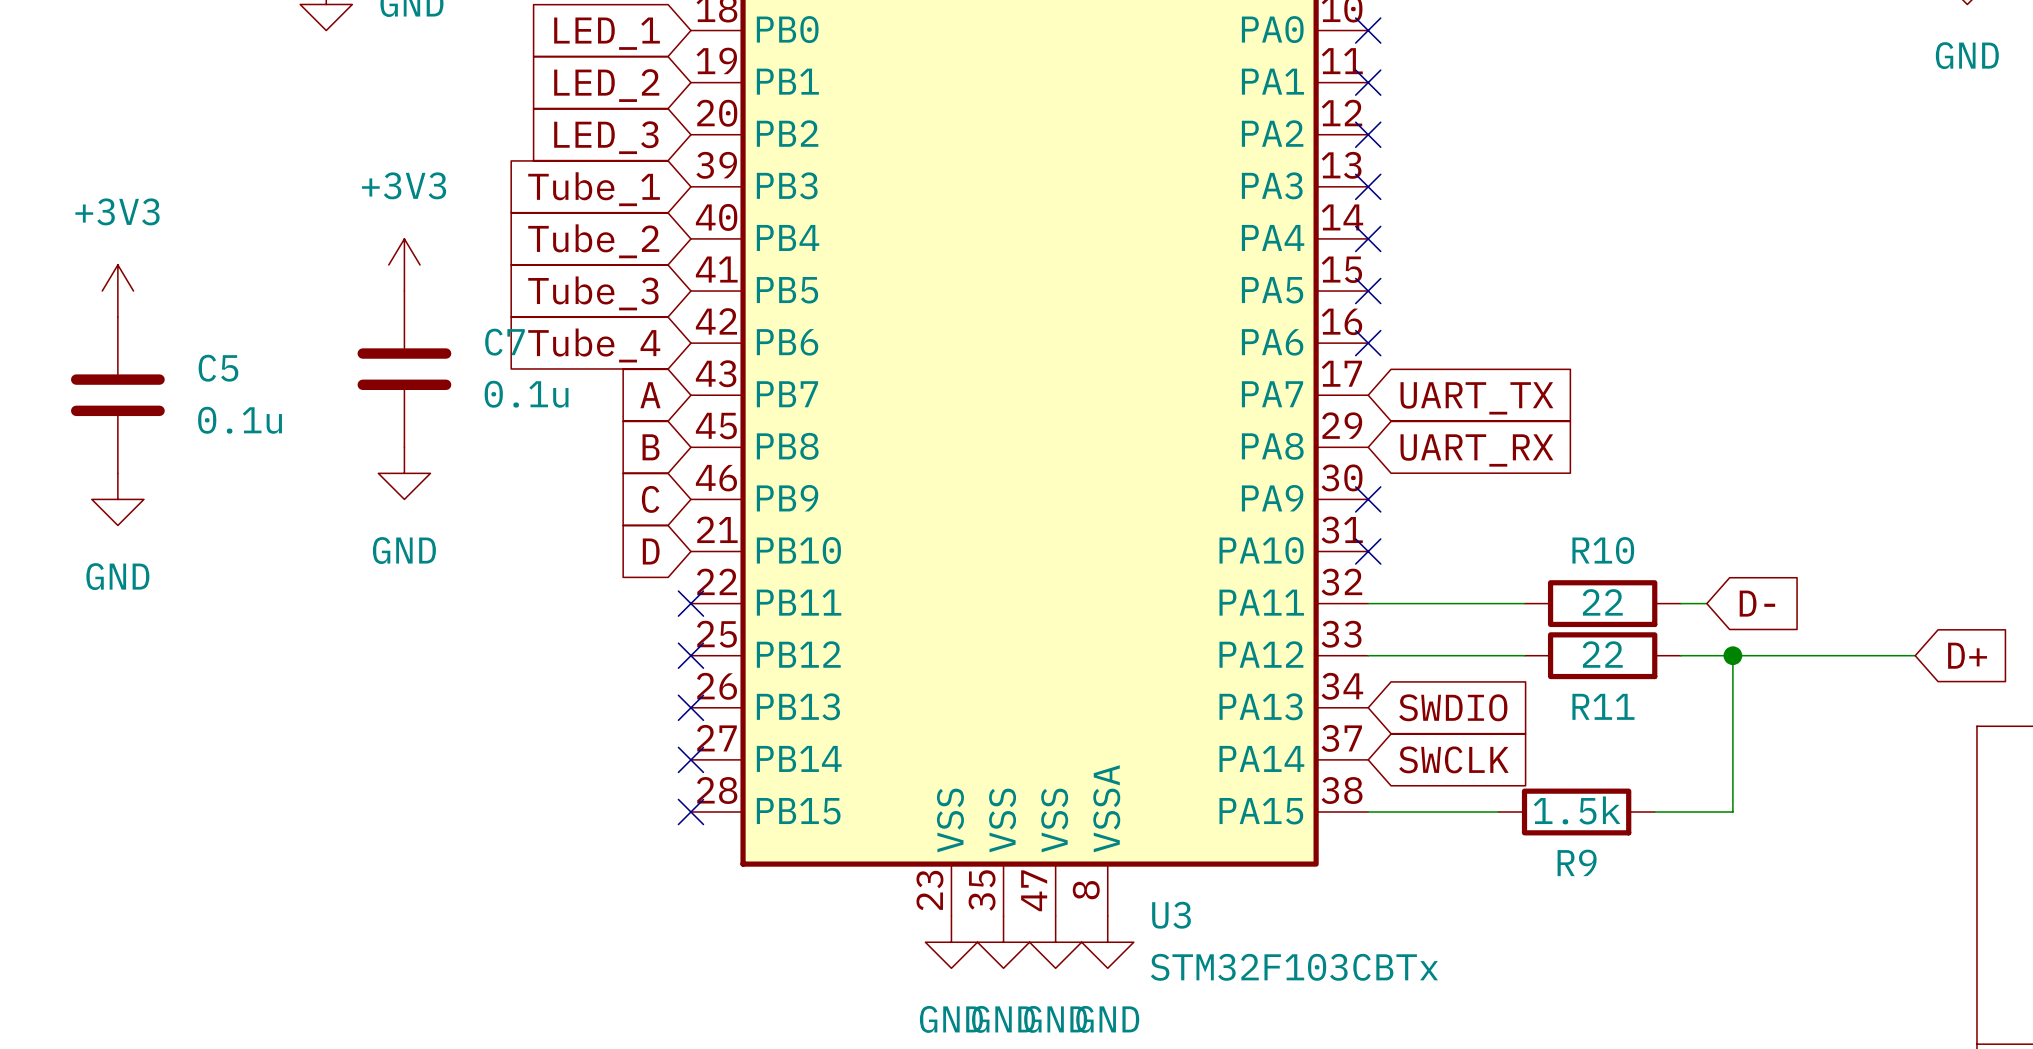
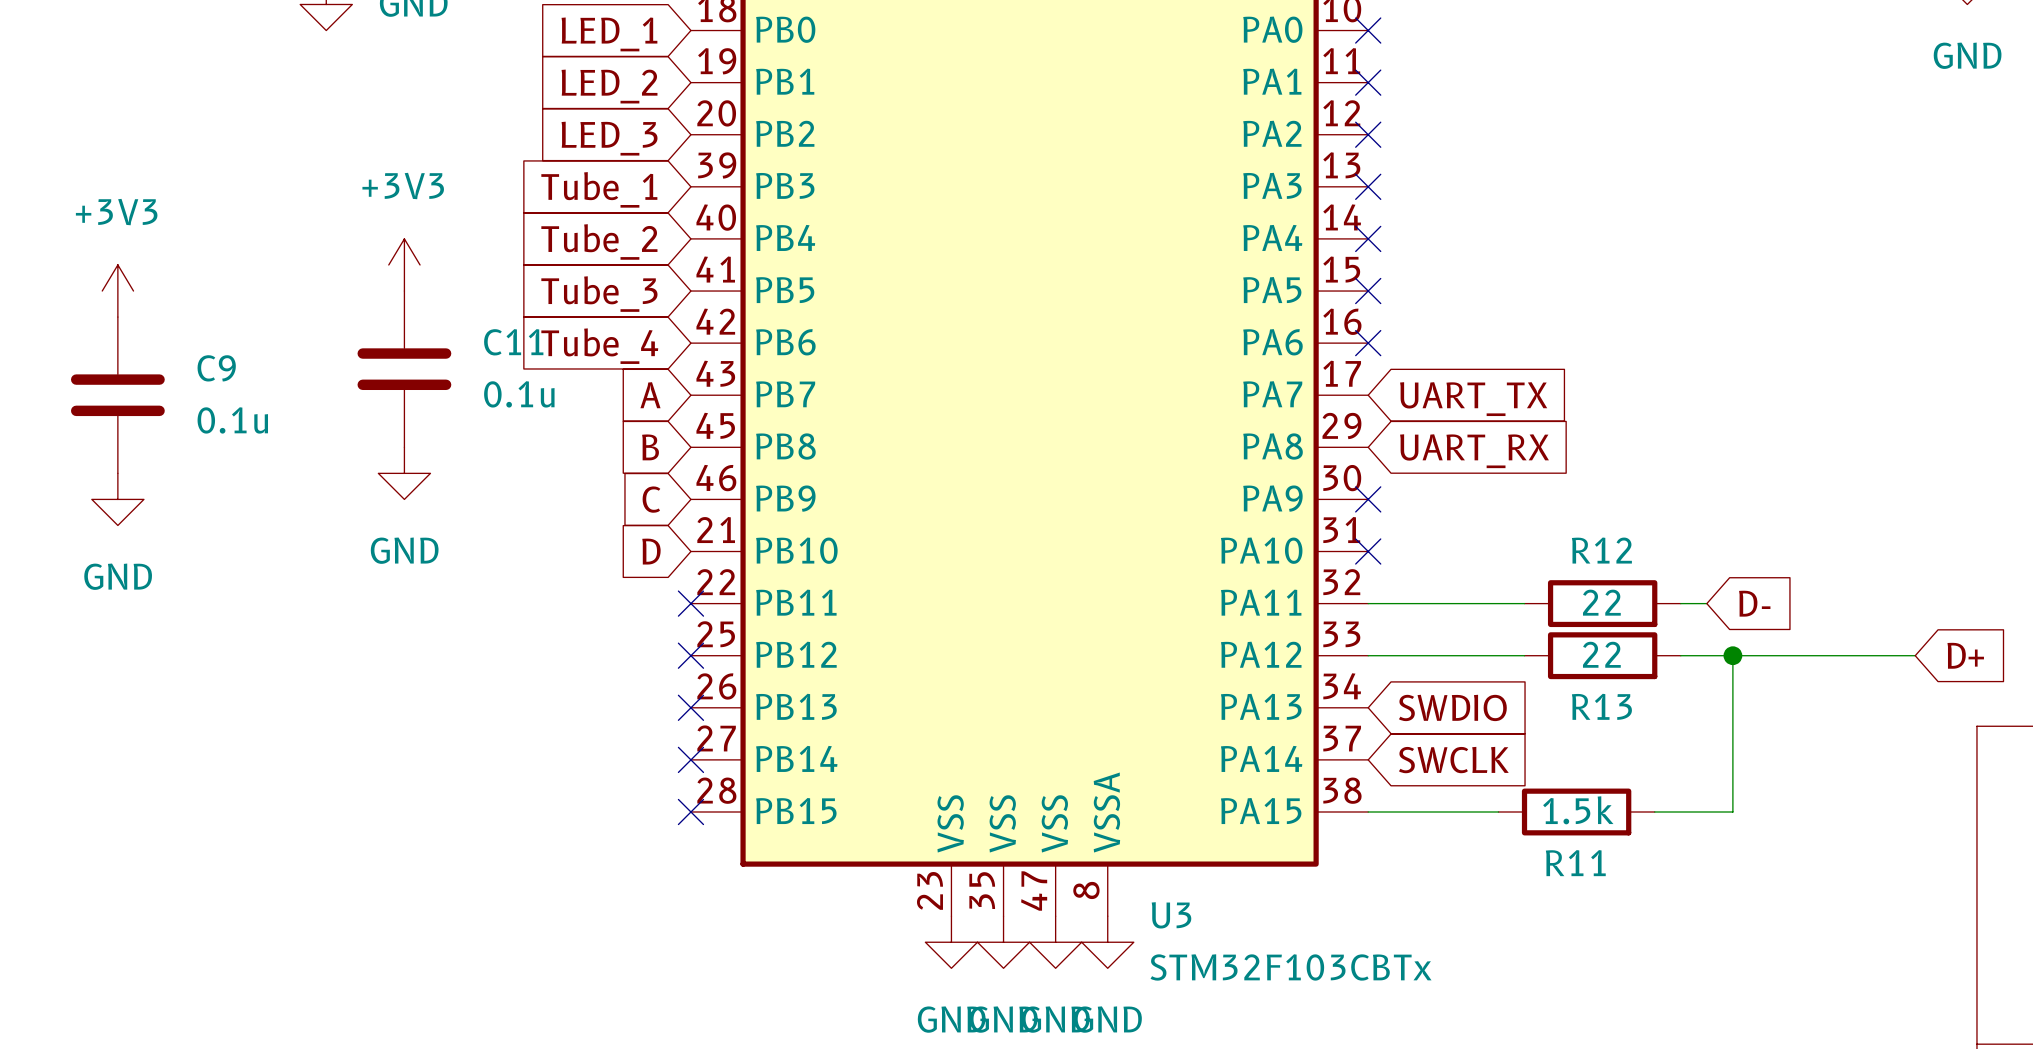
C7 name: C7 (504, 342) -> C11 (513, 342)
C5 name: C5 (218, 368) -> C9 (216, 368)
R10 name: R10 (1603, 550) -> R12 (1601, 550)
R11 name: R11 (1603, 706) -> R13 (1601, 706)
R9 name: R9 (1577, 862) -> R11 (1575, 863)

